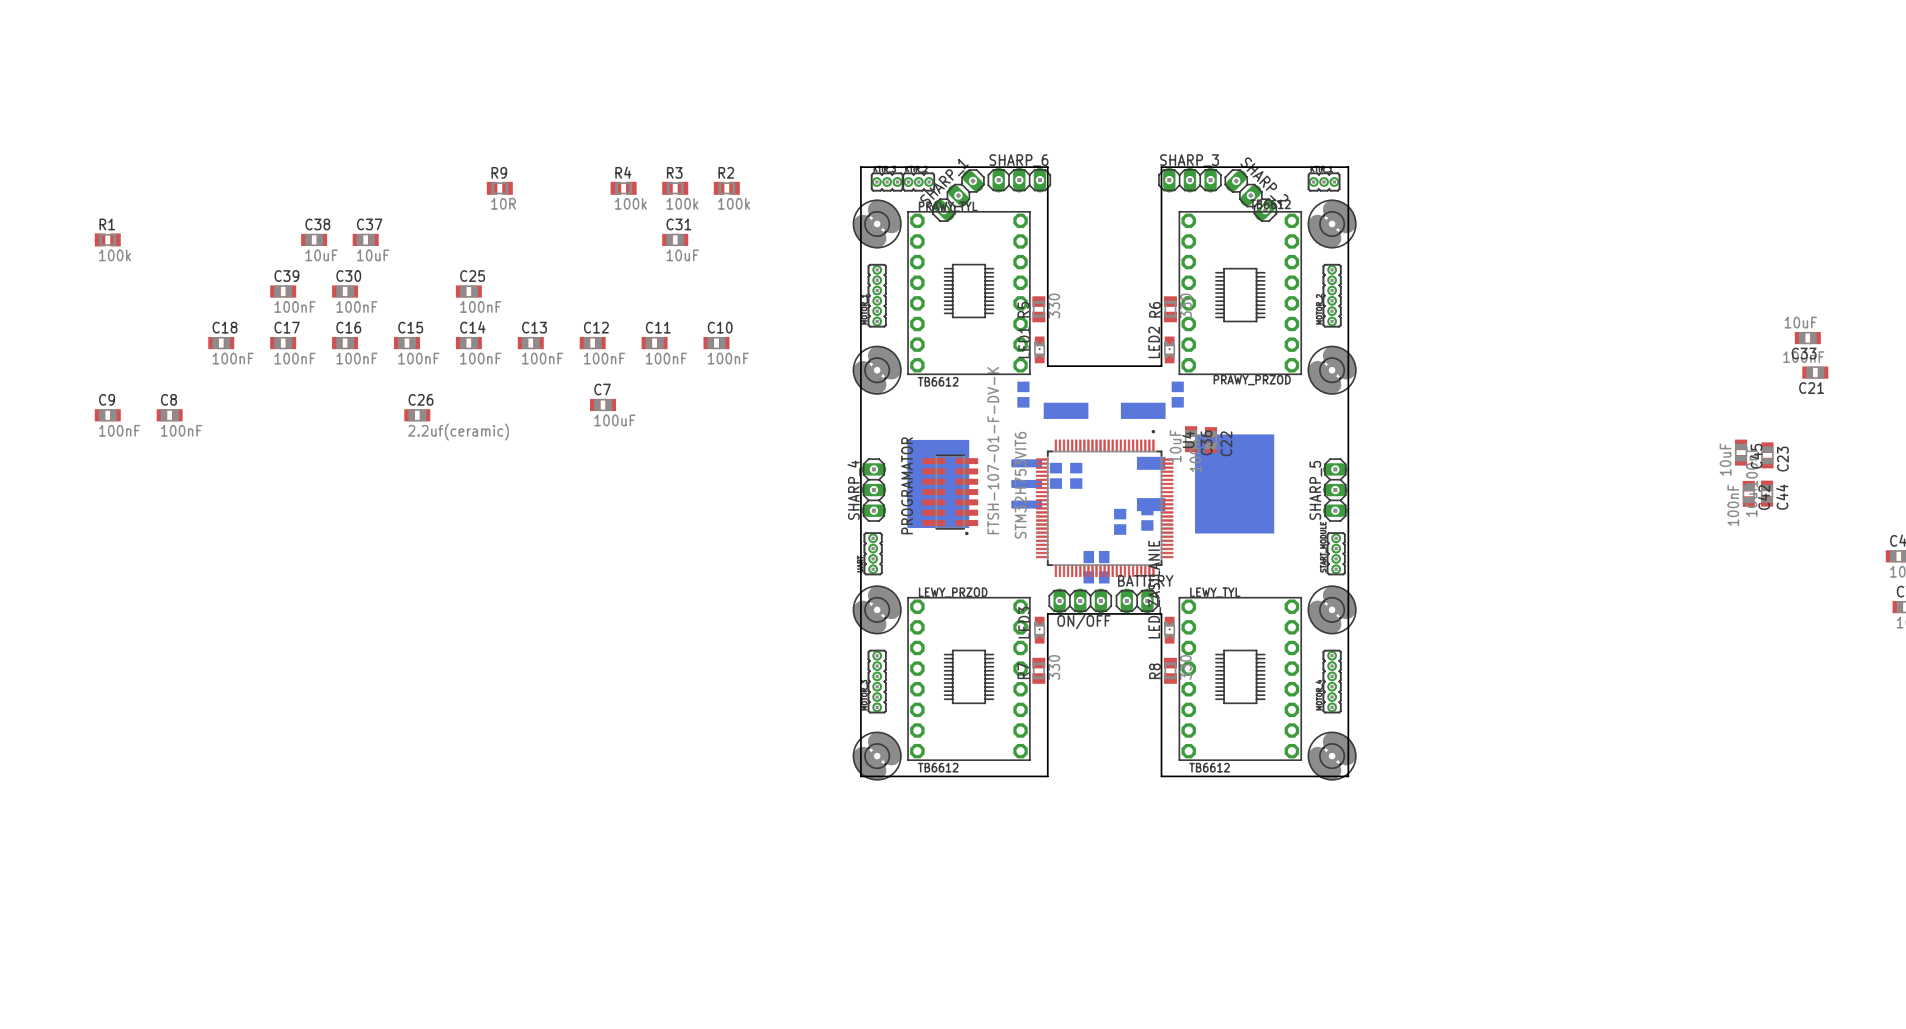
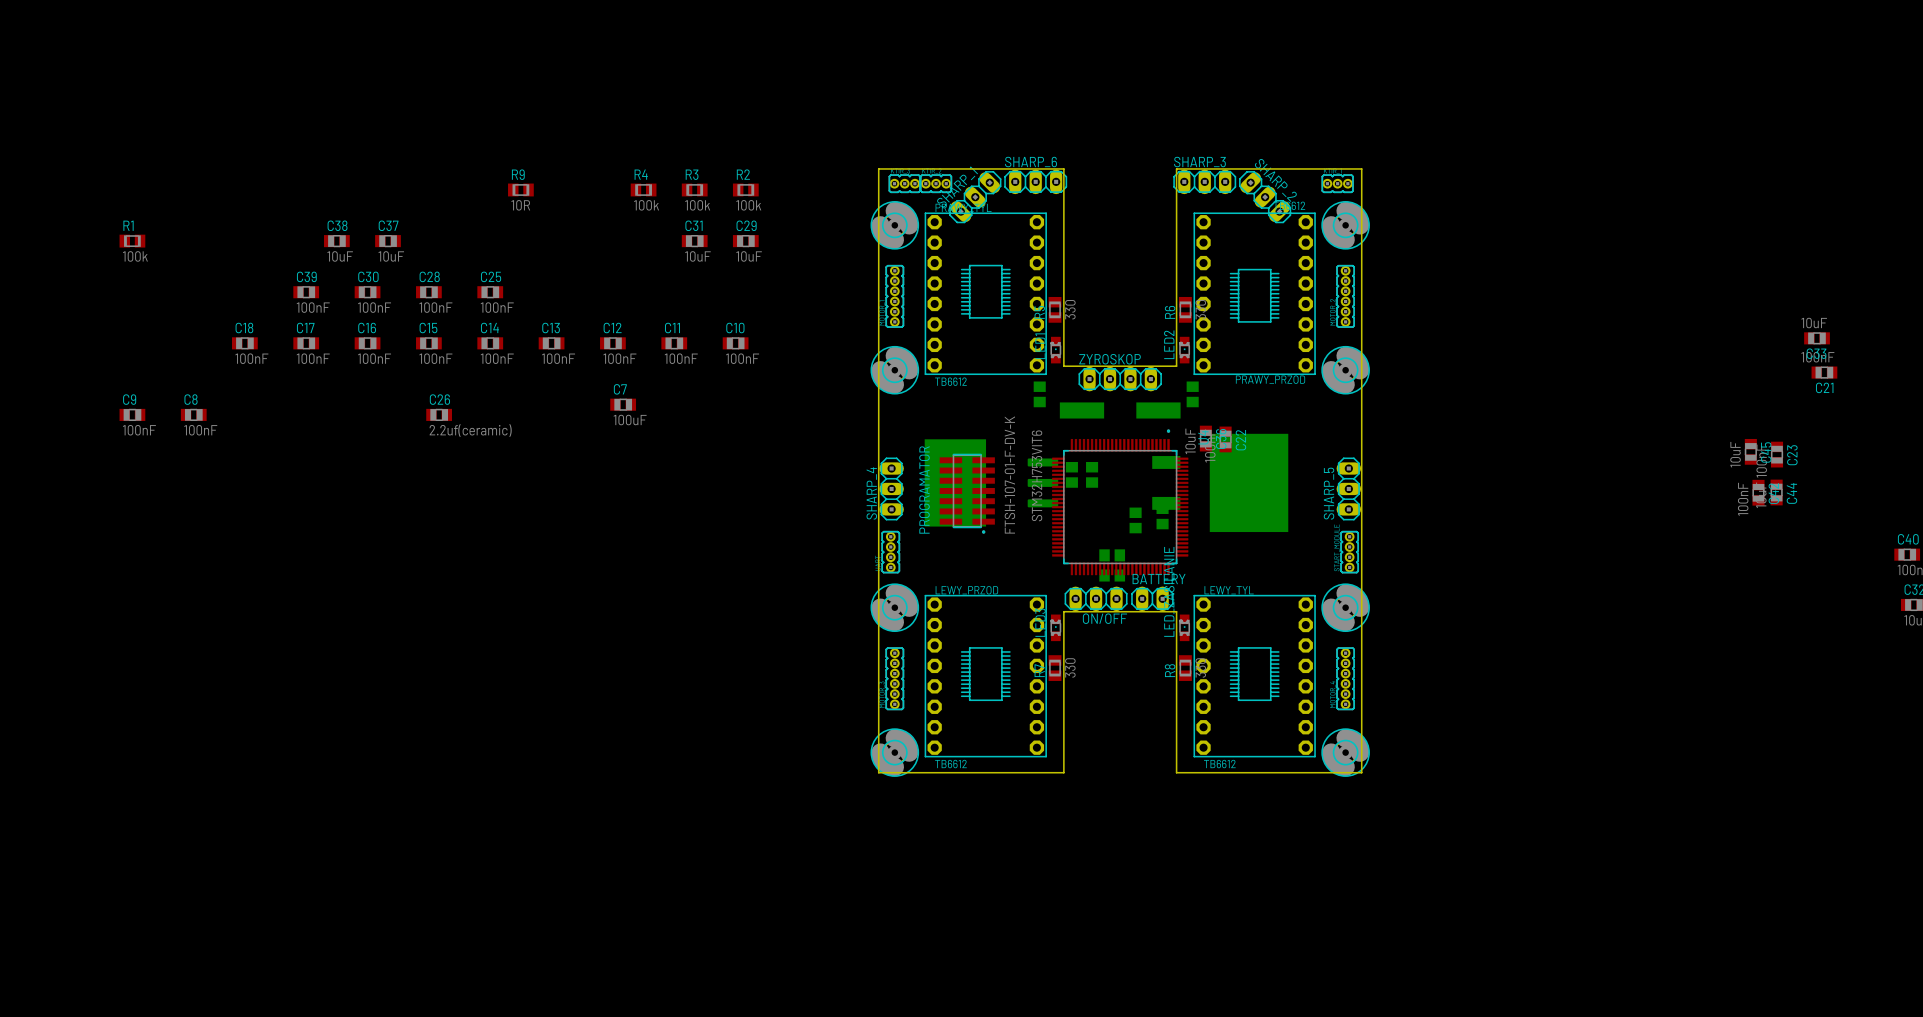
C29: none -> 10uF (745, 241)
C28: none -> 100nF (428, 292)
ZYROSKOP: none -> (1120, 379)

